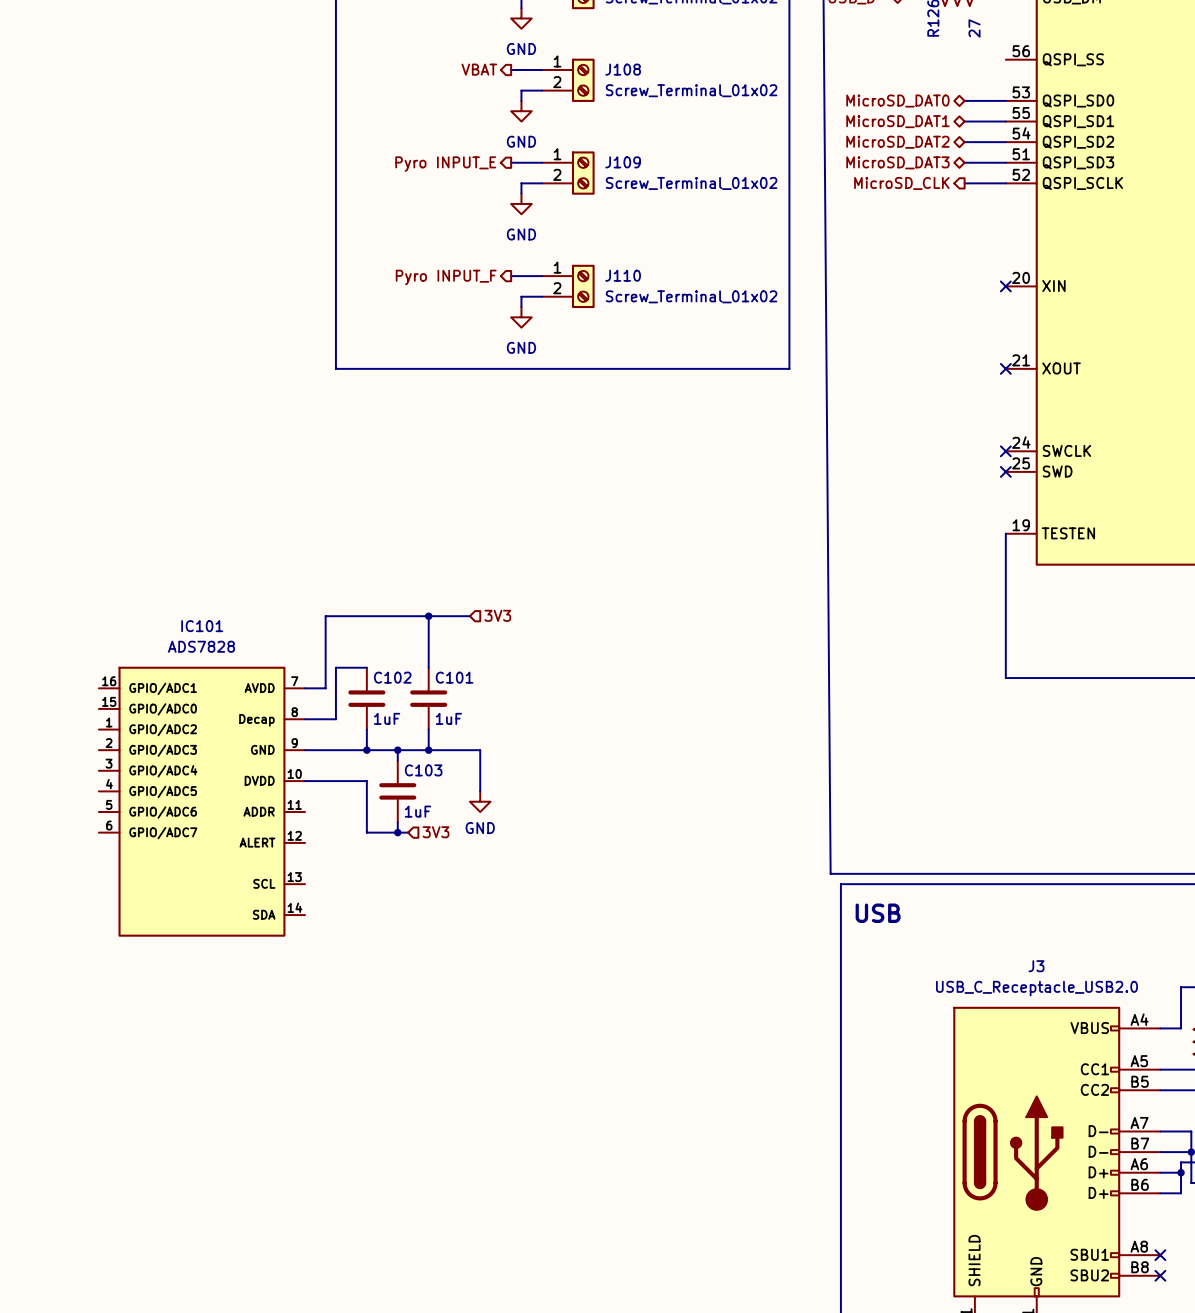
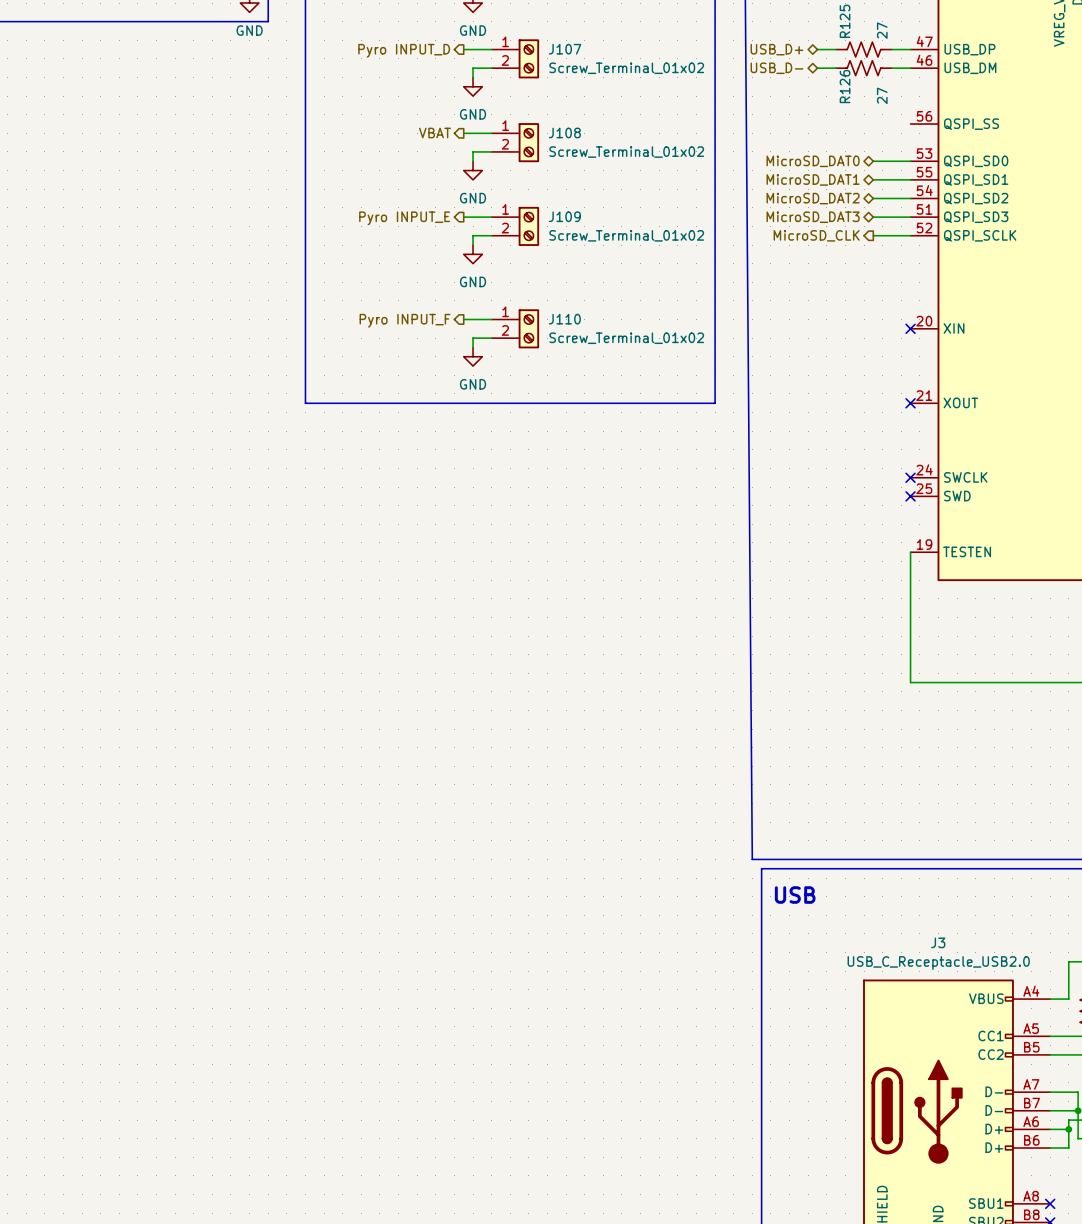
hierarchical label: 3V3 (497, 615) -> none
wire: (428, 616) (428, 667) -> none
junction: (428, 616) -> none
wire: (469, 616) (325, 616) (325, 688) (305, 688) -> none
wire: (366, 667) (335, 667) (335, 719) (305, 719) -> none
C102: 1uF (366, 698) -> none
C101: 1uF (428, 698) -> none
wire: (366, 729) (366, 750) -> none
wire: (428, 729) (428, 750) -> none
wire: (305, 750) (480, 750) (480, 791) -> none
junction: (366, 750) -> none
wire: (397, 750) (397, 760) -> none
junction: (397, 750) -> none
junction: (428, 750) -> none
wire: (305, 781) (366, 781) (366, 832) (408, 832) -> none
C103: 1uF (397, 791) -> none
IC101: ADS7828 (201, 801) -> none
power symbol: GND (480, 801) -> none
wire: (397, 822) (397, 832) -> none
junction: (397, 832) -> none
hierarchical label: 3V3 (435, 832) -> none

